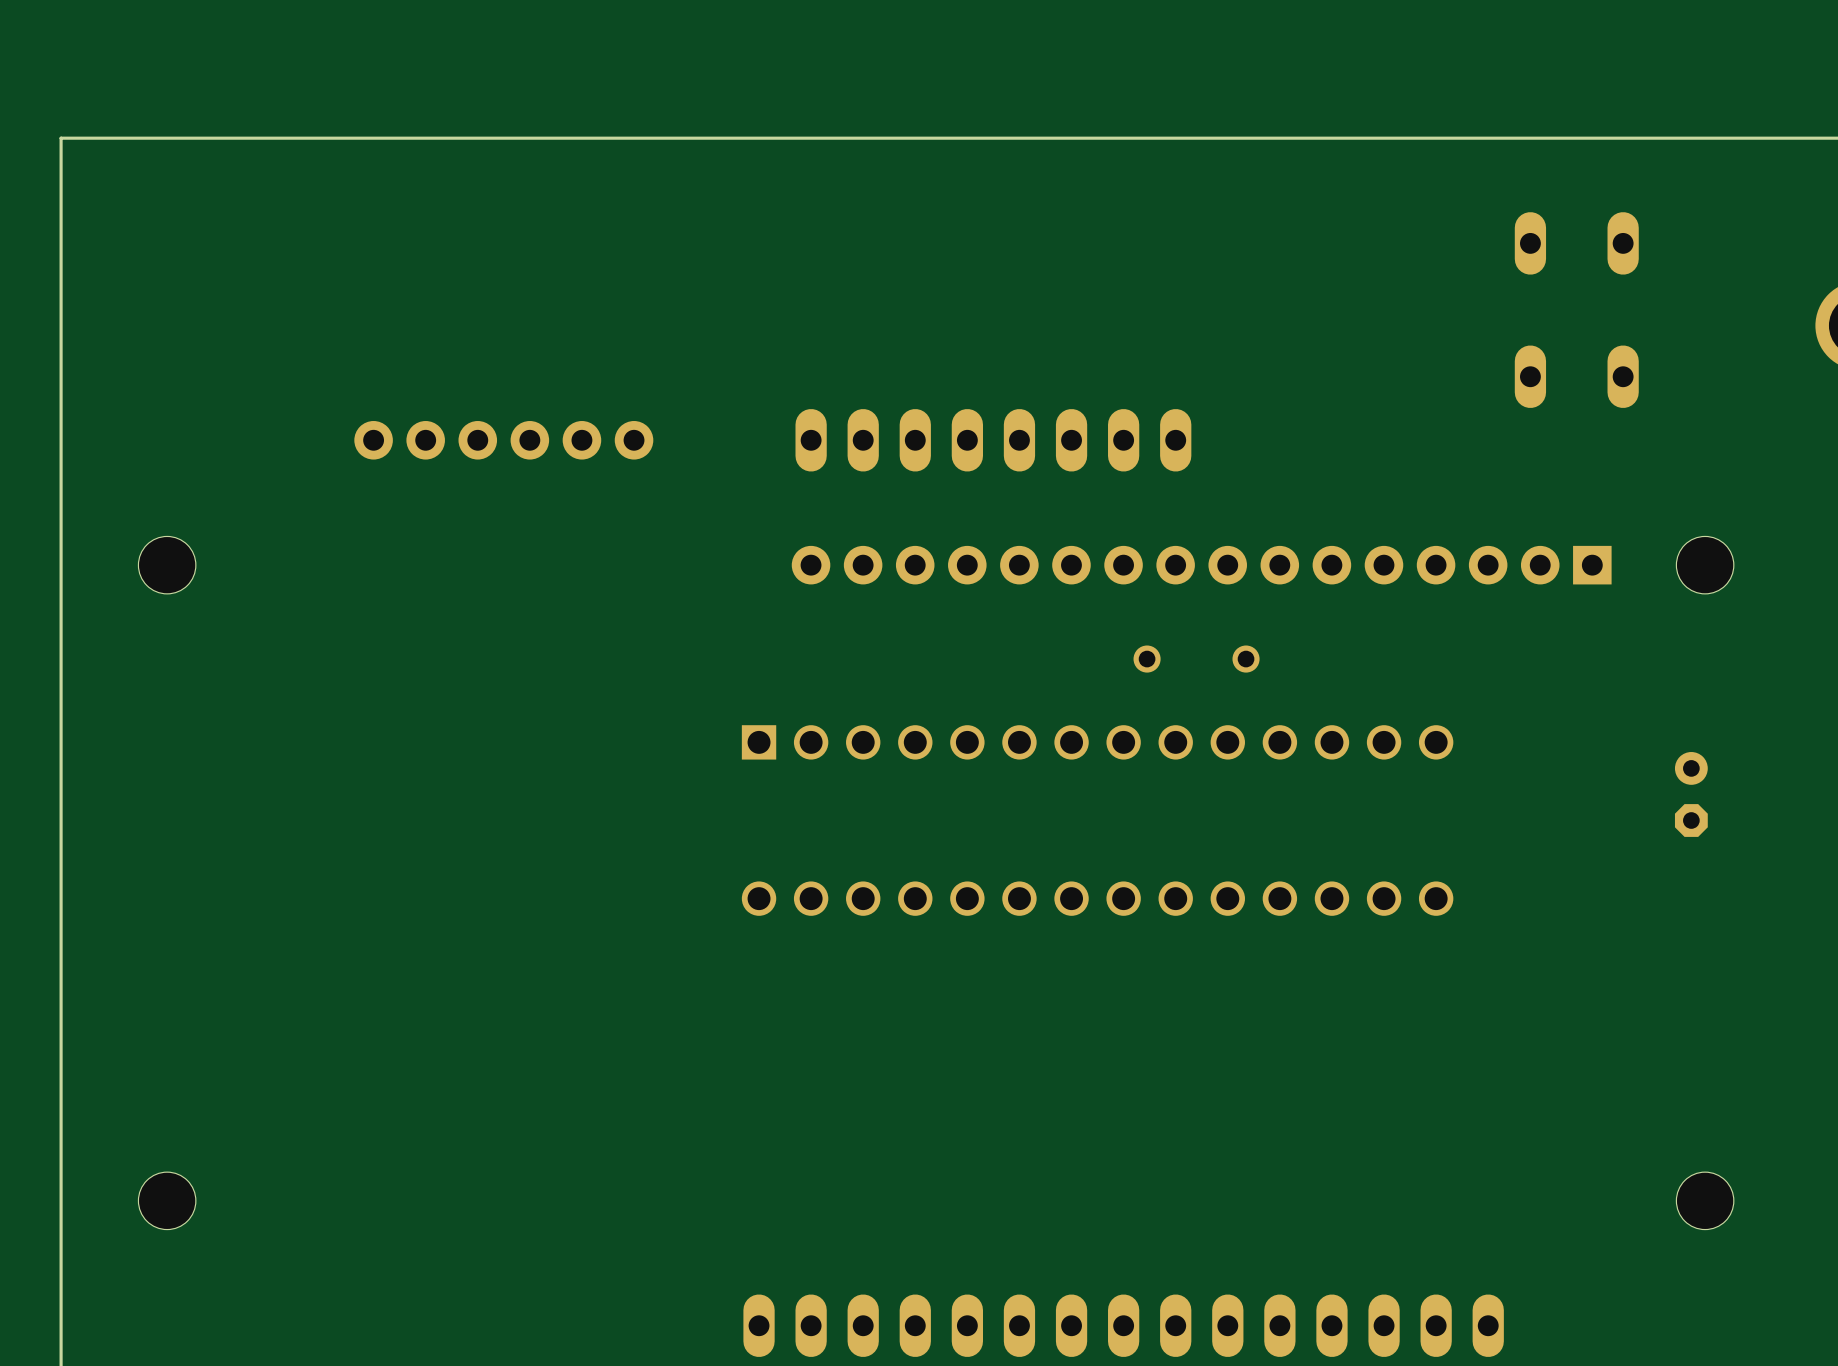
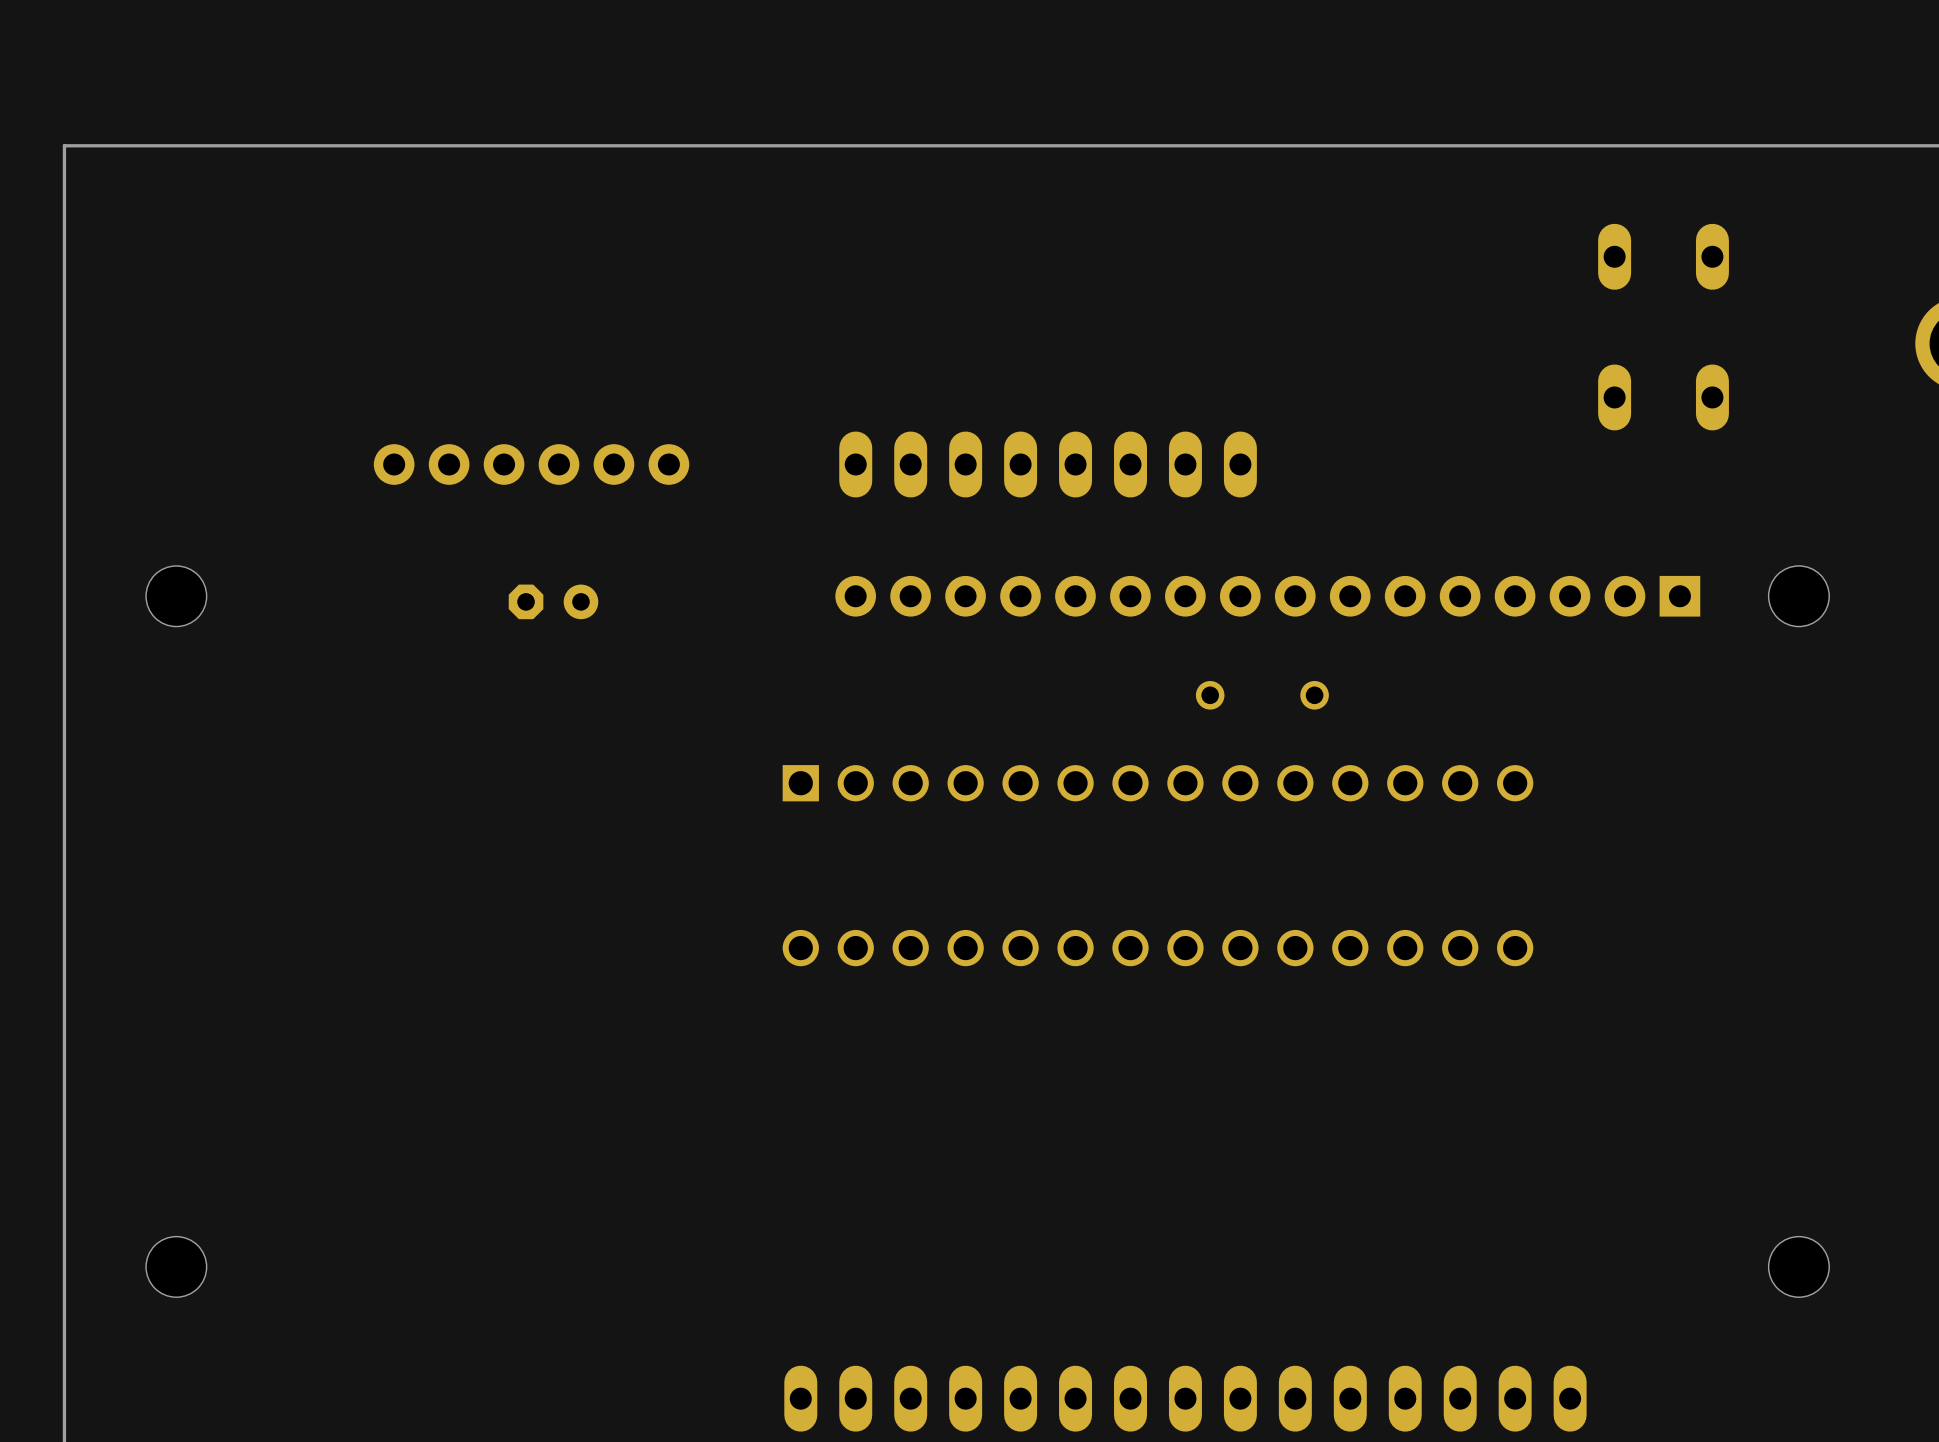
part: none -> (553, 601)
part: (1691, 794) -> none

